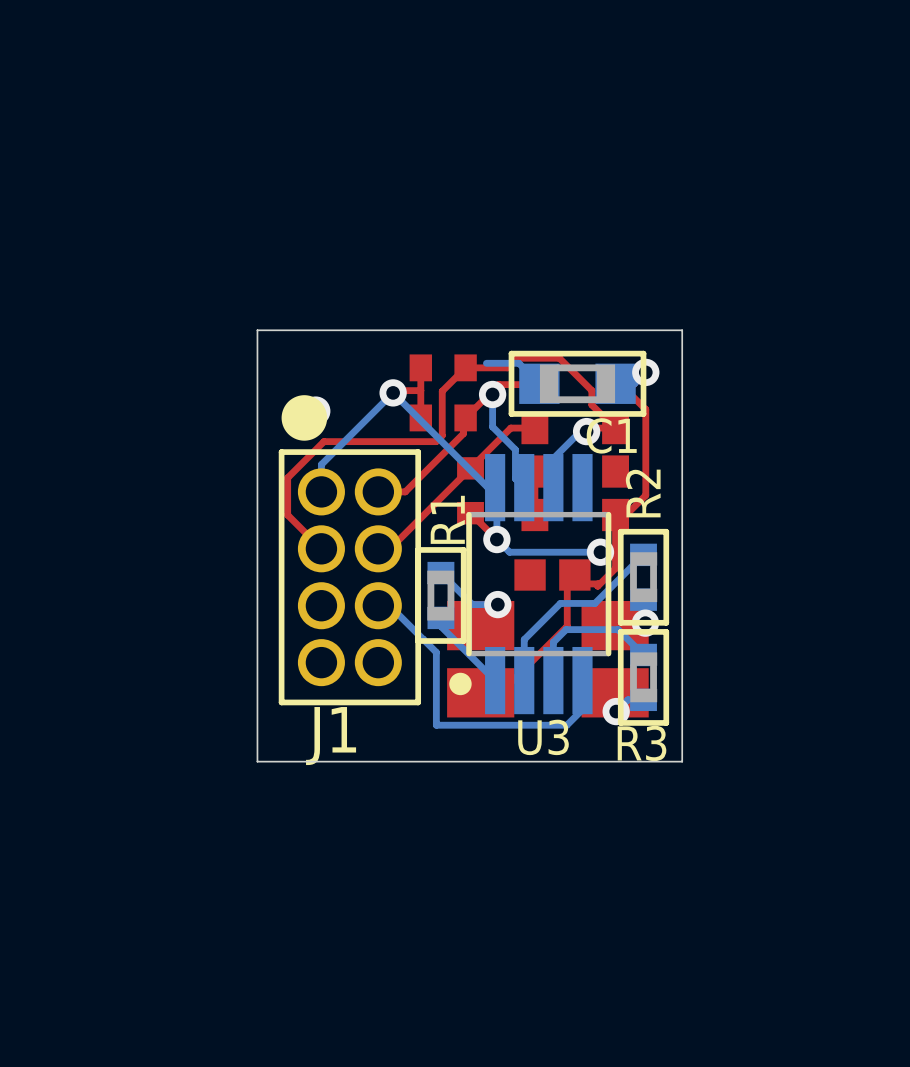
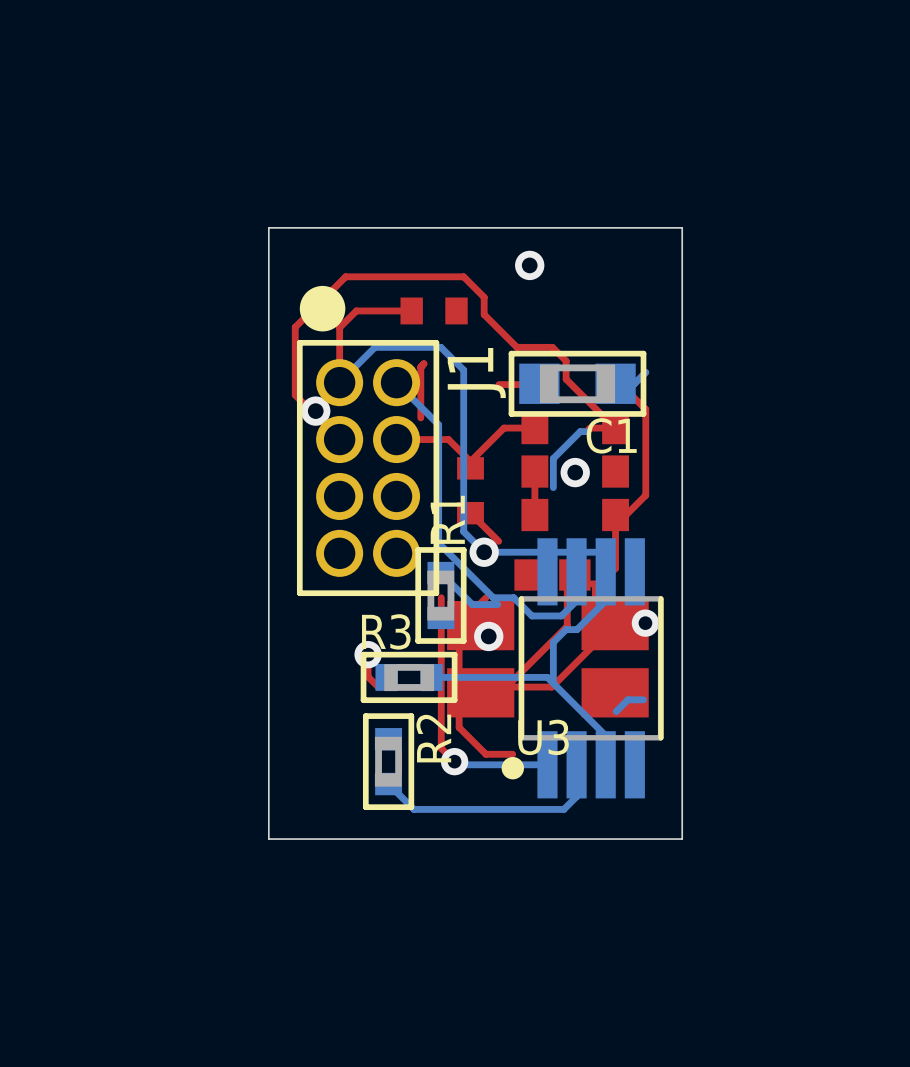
via: none -> (529, 265)
top track: none -> (411, 310) (356, 310) (339, 327) (339, 382)
part: none -> (434, 310)
board edge: (682, 330) (257, 330) (257, 761) (682, 761) -> (682, 330) (682, 227) (268, 227) (268, 839) (682, 839) (682, 761)
bottom track: (486, 363) (518, 363) (539, 383) -> none
part: (443, 367) -> none
via: (645, 372) -> none
bottom track: none -> (396, 382) (438, 424) (438, 543) (493, 597) (513, 597) (531, 615) (561, 615) (576, 600) (576, 571)
via: (393, 392) -> none
top track: (492, 394) (498, 388) (498, 384) (463, 420) (463, 433) (405, 491) (378, 491) -> none
bottom track: (492, 394) (492, 426) (515, 449) (515, 478) (524, 487) -> none
via: (492, 394) -> none
top track: (591, 404) (591, 390) (559, 358) (517, 358) (507, 367) (465, 367) (442, 391) (442, 435) (436, 441) (323, 441) (287, 477) (287, 515) (321, 548) -> (591, 404) (566, 379) (566, 361) (552, 347) (516, 347) (484, 314) (484, 297) (463, 276) (345, 276) (295, 327) (295, 395) (339, 439)
part: (443, 417) -> none
top track: (510, 428) (390, 548) (378, 548) -> (510, 428) (503, 428) (470, 461) (448, 439) (396, 439)
via: (586, 431) -> none
via: none -> (575, 472)
bottom track: (321, 491) (321, 464) (393, 392) (496, 496) (496, 539) (509, 552) -> (339, 382) (374, 347) (440, 347) (463, 370) (463, 531) (484, 552) (509, 552)
R2 name position: R2 (643, 493) -> R2 (433, 738)
via position: (496, 539) -> (484, 552)
J1 position: (349, 550) -> (368, 440)
via: (600, 552) -> none
bottom track: (643, 554) (594, 603) (560, 603) (524, 639) (524, 680) -> none
R2 position: (643, 577) -> (388, 761)
U3 position: (530, 584) -> (582, 668)
top track: none -> (597, 586) (595, 588) (595, 643) (551, 687) (512, 687)
top track: none -> (441, 597) (441, 748) (454, 761)
top track: none -> (486, 597) (459, 624) (459, 727) (485, 754) (512, 754)
via: (497, 604) -> none
bottom track: (378, 605) (389, 605) (436, 652) (436, 725) (566, 725) (582, 709) (582, 680) -> none
bottom track: (440, 617) (440, 626) (495, 680) -> none
bottom track: (576, 629) (618, 629) (643, 655) -> (576, 629) (605, 600) (605, 571)
via: none -> (488, 636)
top track: none -> (368, 654) (368, 676) (378, 687)
via: none -> (368, 654)
bottom track: none -> (431, 677) (547, 677) (605, 735) (605, 764)
R3 rotation: 0° (643, 677) -> 90° clockwise (409, 677)
R3 position: (643, 677) -> (409, 677)
via: (616, 711) -> none
J1 name rotation: 0° (331, 736) -> 90° counterclockwise (476, 373)
J1 name position: J1 (331, 736) -> J1 (476, 373)
bottom track: none -> (454, 761) (457, 764) (547, 764)
via: none -> (454, 761)
bottom track: none -> (576, 764) (576, 796) (563, 809) (413, 809) (388, 784)

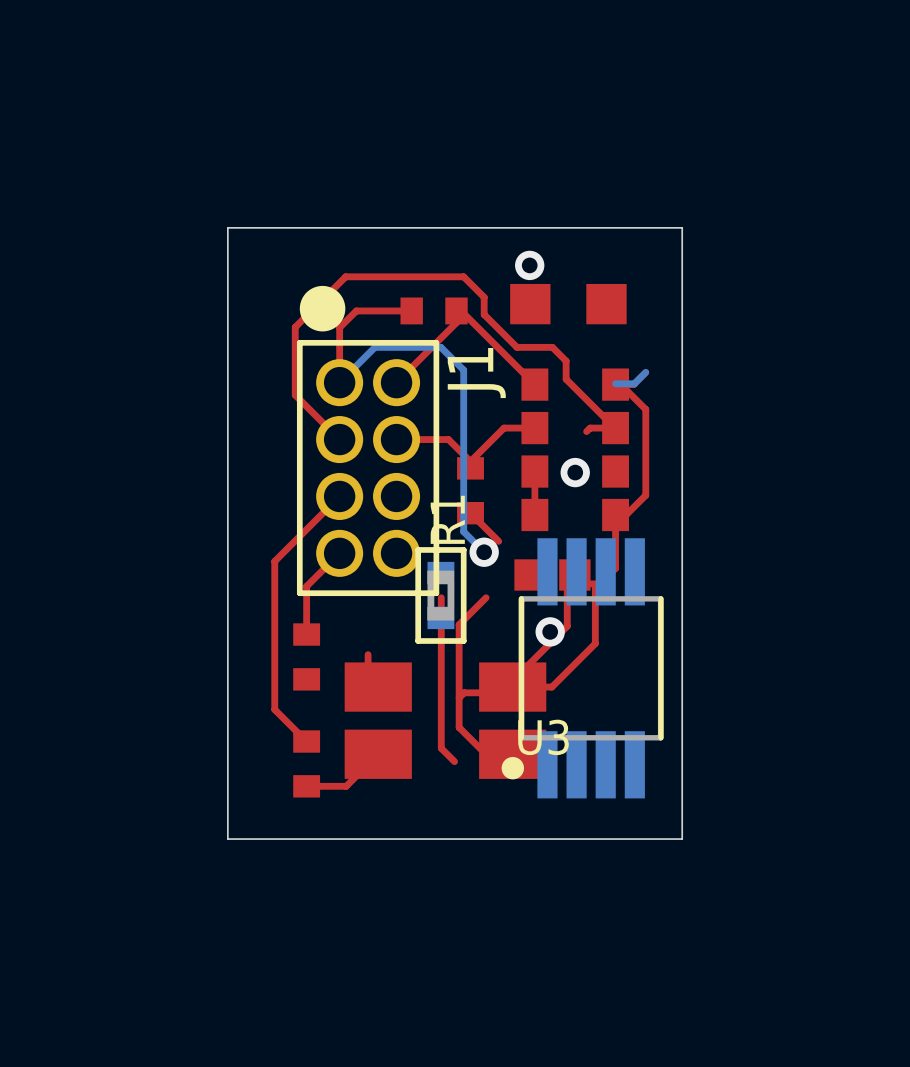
board edge: (268, 227) (268, 839) -> (268, 227) (227, 227) (227, 839) (268, 839)
top track: (420, 367) (423, 363) (420, 366) (420, 417) -> none
bottom track: (396, 382) (438, 424) (438, 543) (493, 597) (513, 597) (531, 615) (561, 615) (576, 600) (576, 571) -> none
C1 side: bottom (577, 383) -> top (568, 304)
top track: (534, 384) (498, 384) -> (534, 384) (461, 310) (456, 310) (456, 322) (396, 382)
via: (315, 411) -> none
bottom track: (586, 431) (580, 431) (553, 458) (553, 487) -> none
top track: none -> (339, 496) (274, 561) (274, 709) (306, 741)
bottom track: (600, 552) (484, 552) -> none
top track: none -> (339, 553) (306, 586) (306, 634)
bottom track: (605, 571) (605, 600) (576, 629) (566, 629) (553, 642) (553, 680) -> none
bottom track: (440, 573) (472, 604) (497, 604) -> none
via: (645, 623) -> none
via position: (488, 636) -> (550, 631)
via: (368, 654) -> none
part position: (547, 659) -> (445, 720)
R3 side: bottom (409, 677) -> top (306, 656)
bottom track: (431, 677) (547, 677) (605, 735) (605, 764) -> none
bottom track: (643, 699) (627, 699) (616, 711) -> none
top track: none -> (378, 754) (346, 786) (306, 786)
R2 side: bottom (388, 761) -> top (306, 763)
bottom track: (454, 761) (457, 764) (547, 764) -> none
via: (454, 761) -> none
bottom track: (576, 764) (576, 796) (563, 809) (413, 809) (388, 784) -> none

